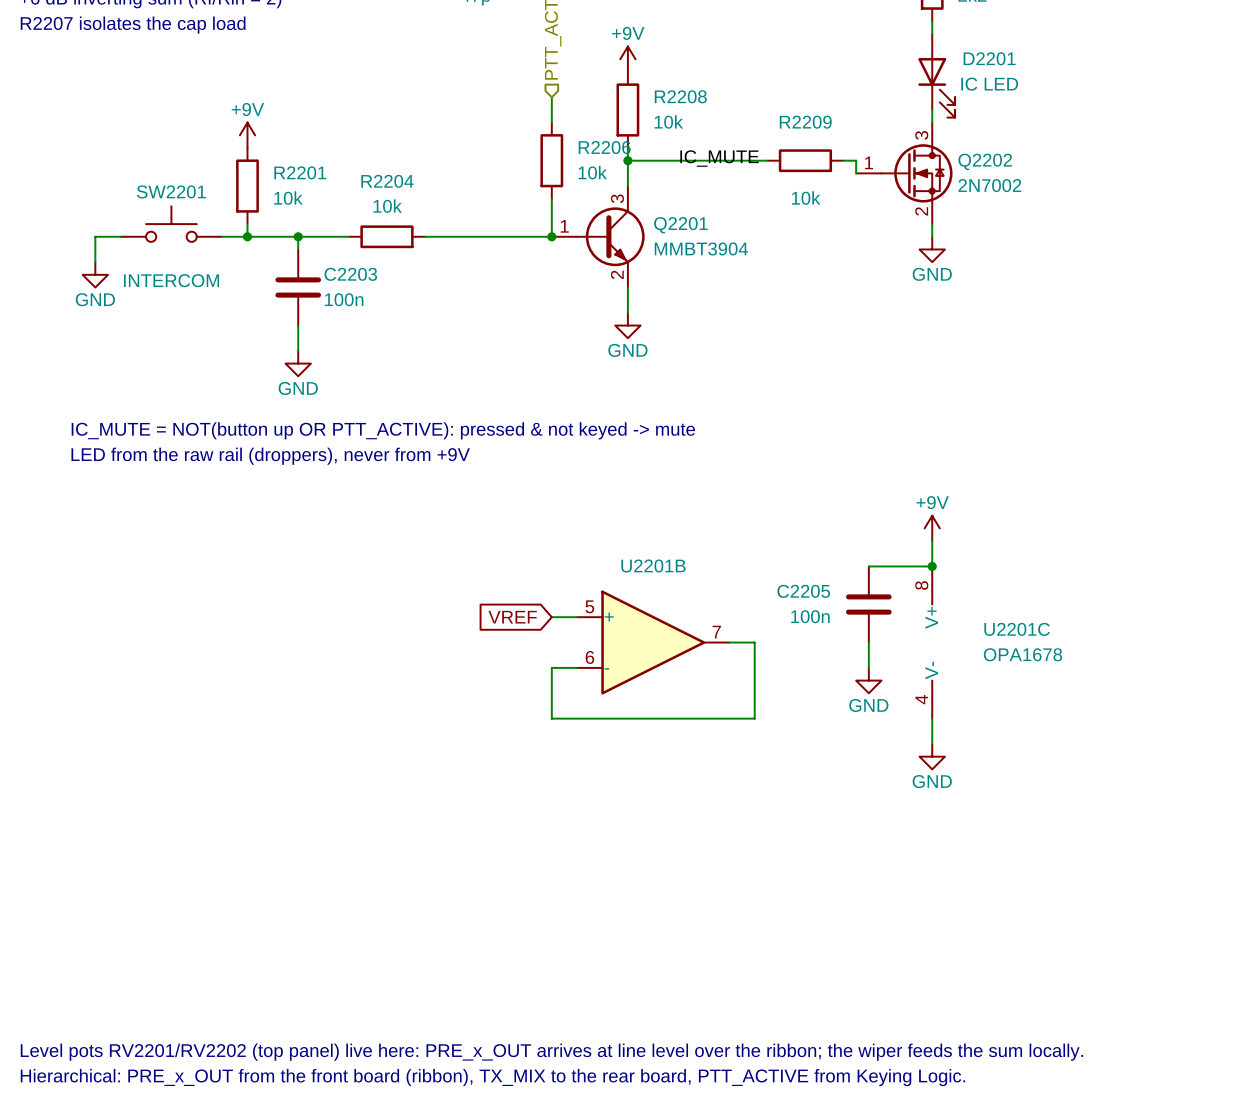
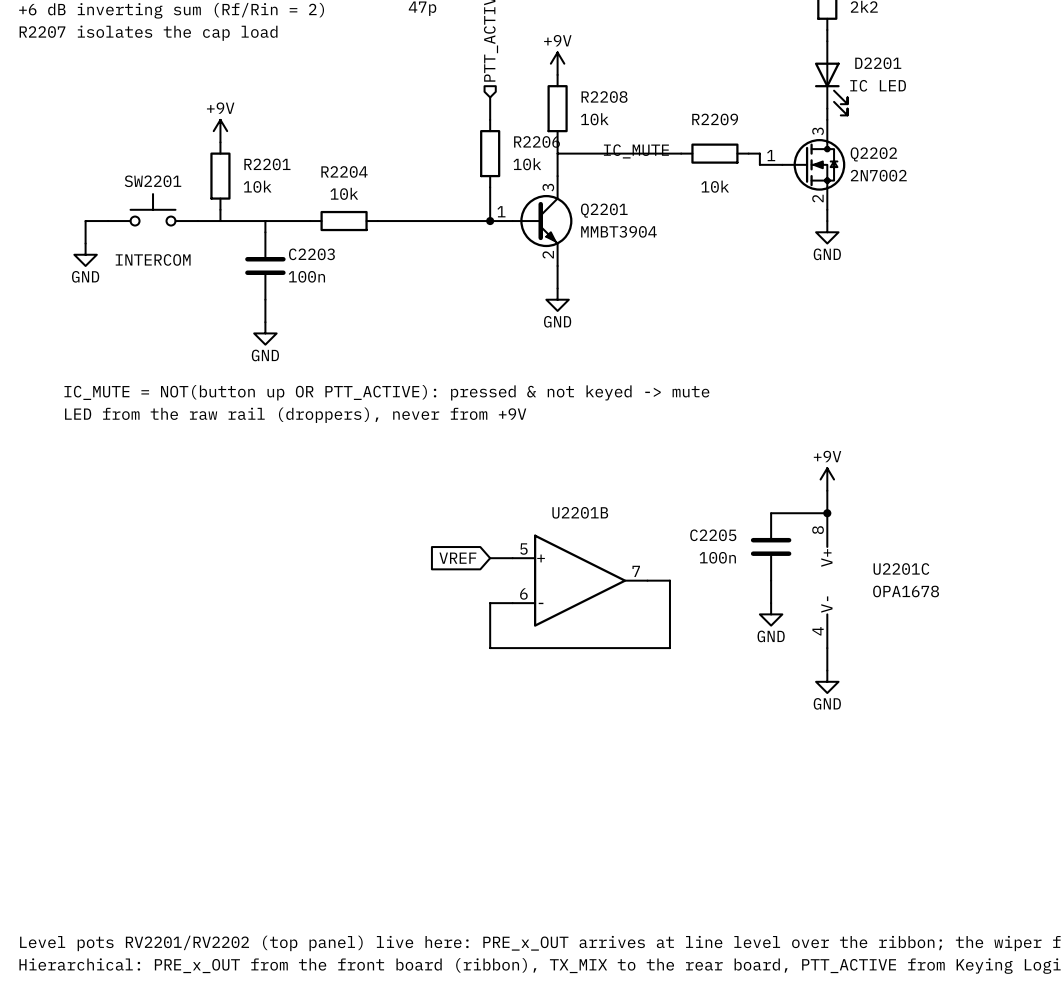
junction: (627, 160) -> none
junction: (247, 236) -> none
junction: (298, 236) -> none

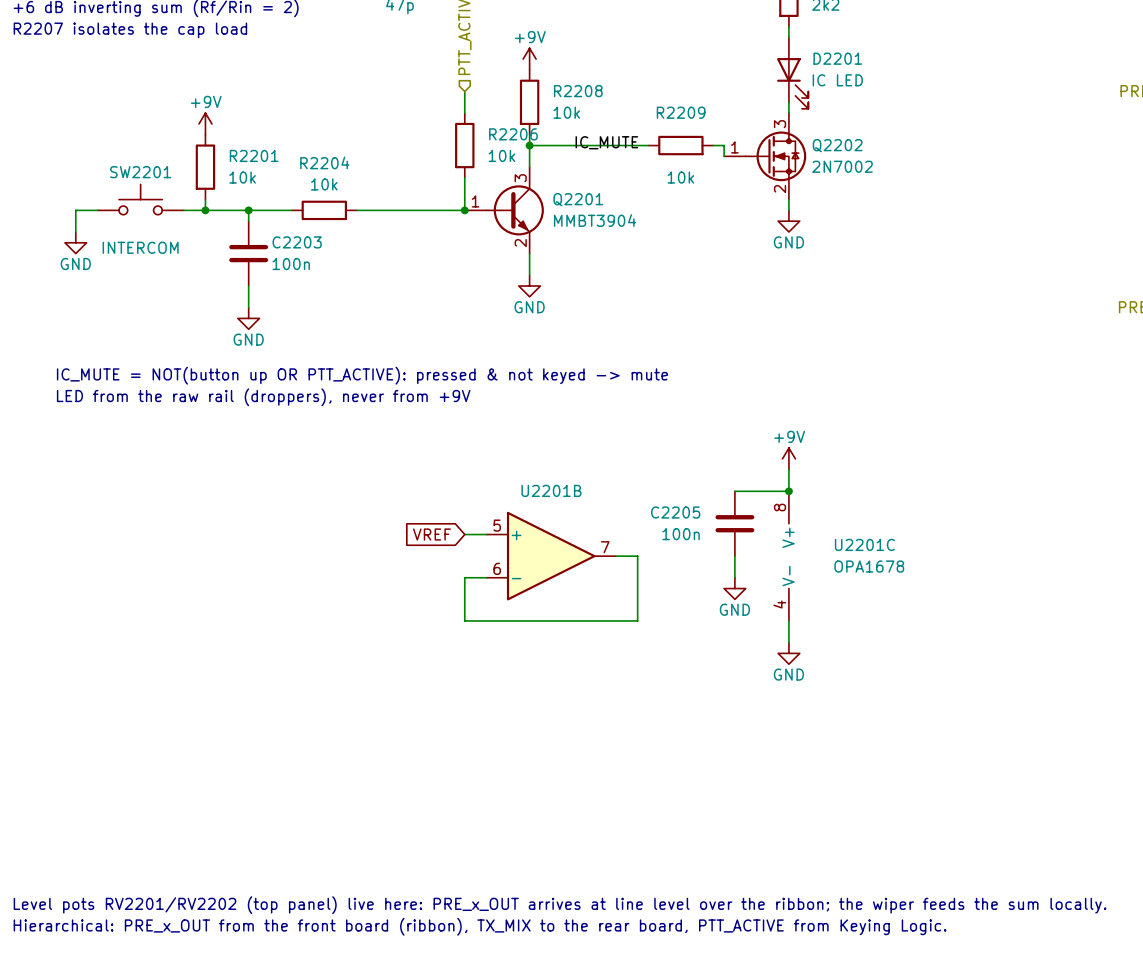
junction: none -> (529, 145)
junction: none -> (205, 210)
junction: none -> (248, 210)

